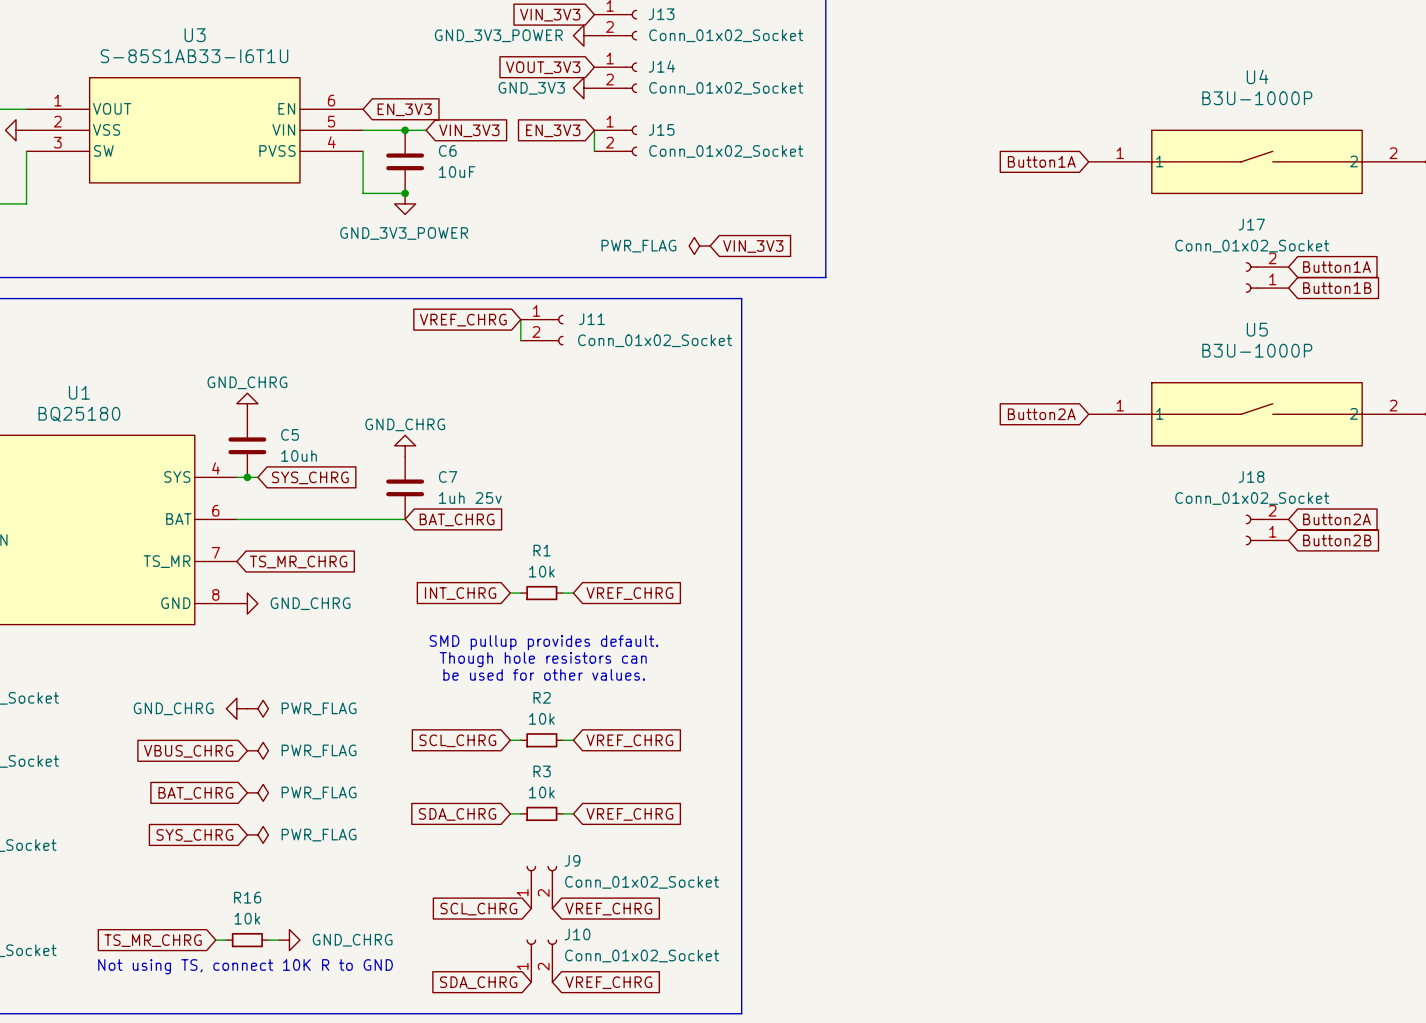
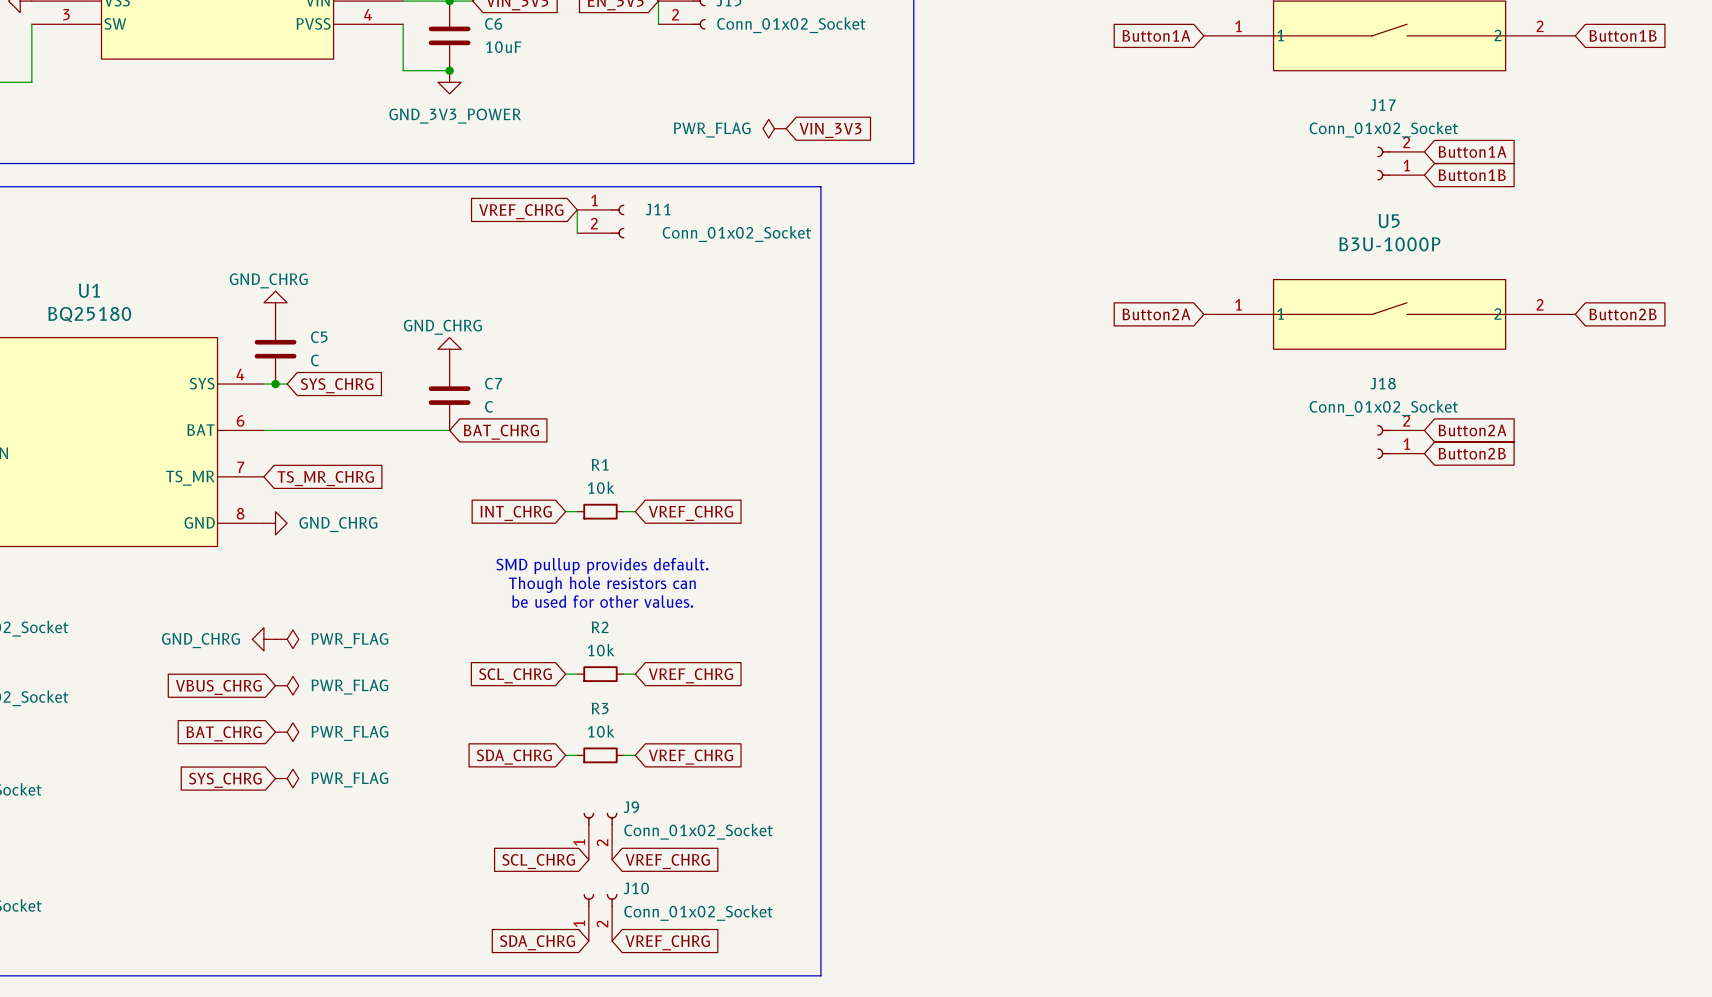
C5 value: 10uh (299, 455) -> C (314, 360)
C7 value: 1uh 25v (470, 498) -> C (489, 406)
global label: TS_MR_CHRG (153, 940) -> none
wire: (215, 940) (226, 940) -> none
R16: 10k (247, 940) -> none
wire: (268, 940) (278, 940) -> none
power symbol: GND_CHRG (289, 940) -> none
text: Not using TS, connect 10K R to GND (245, 966) -> none

